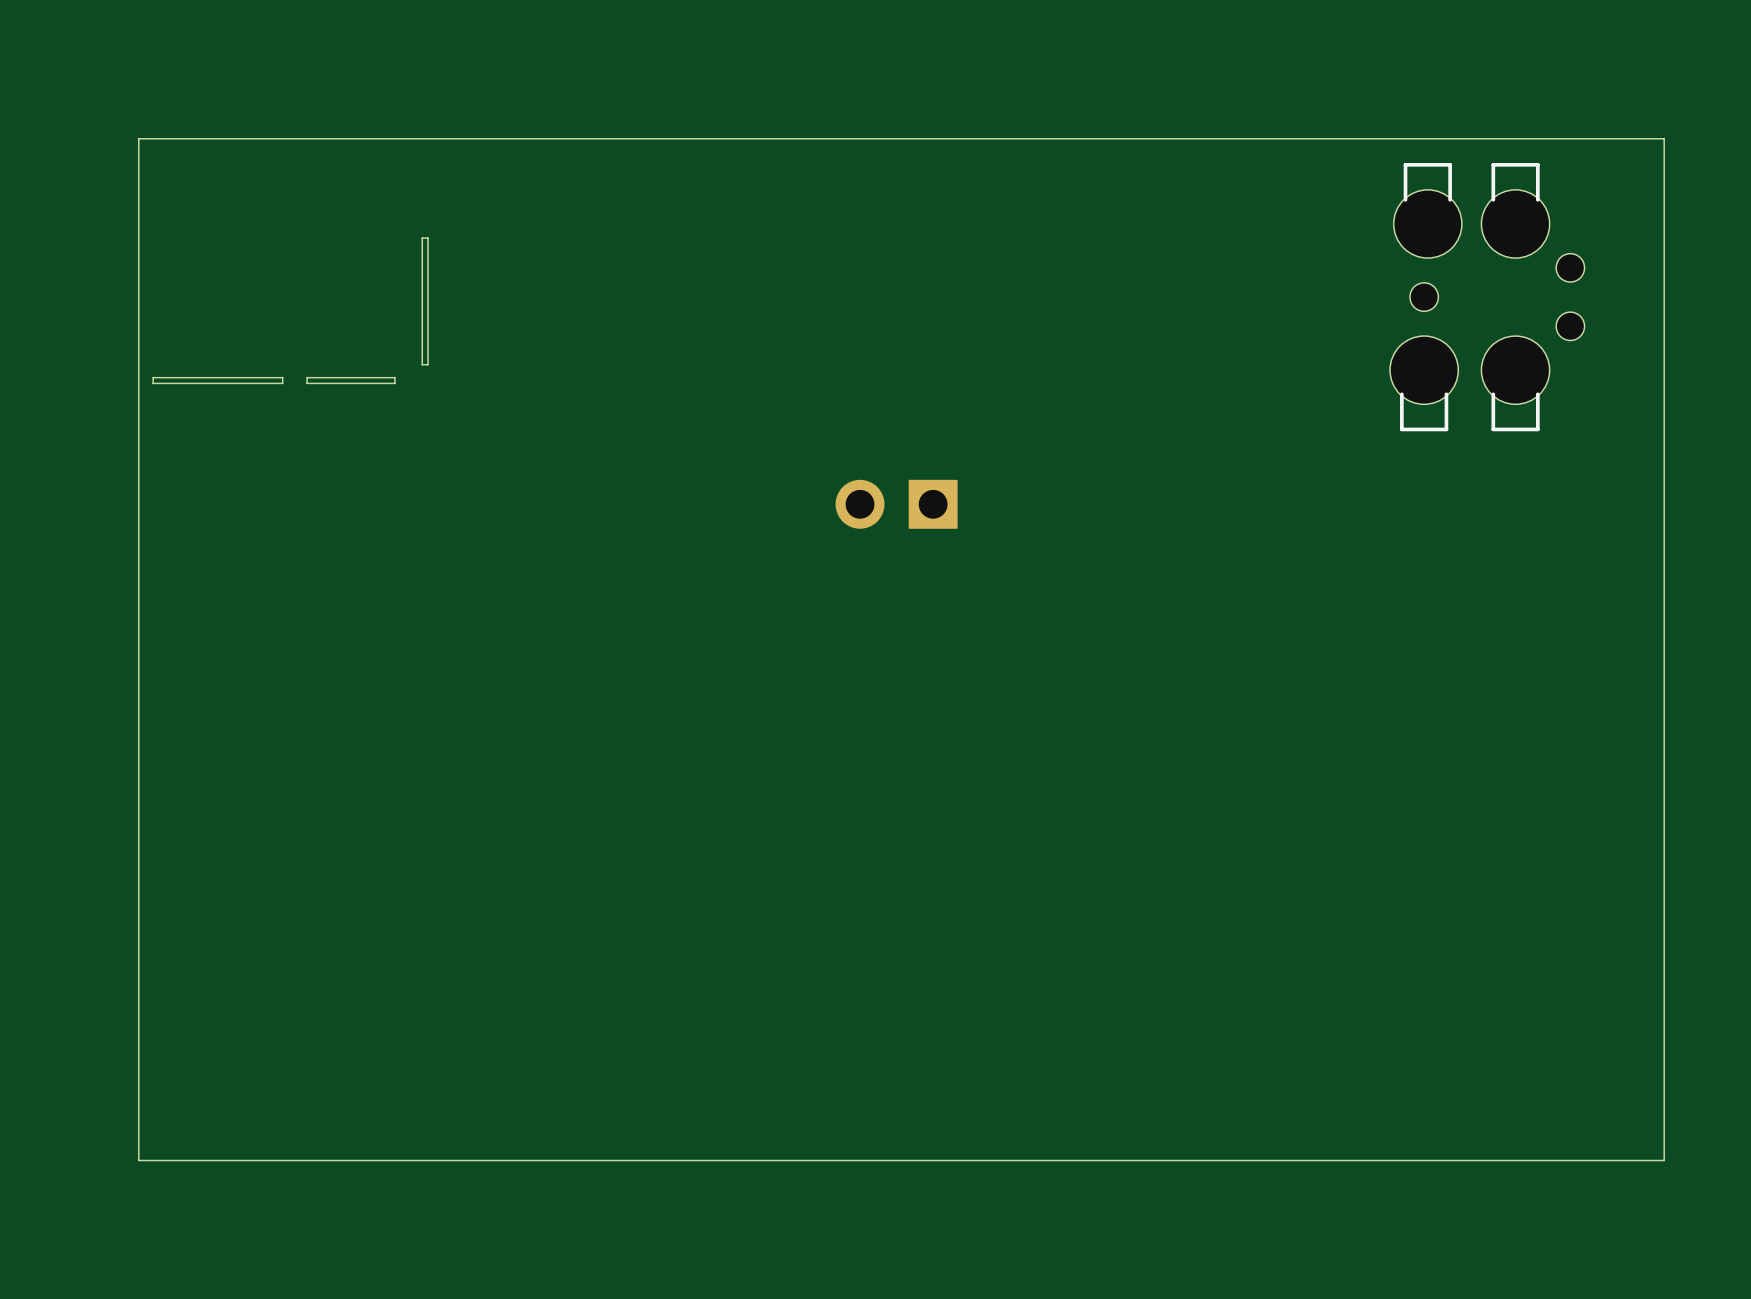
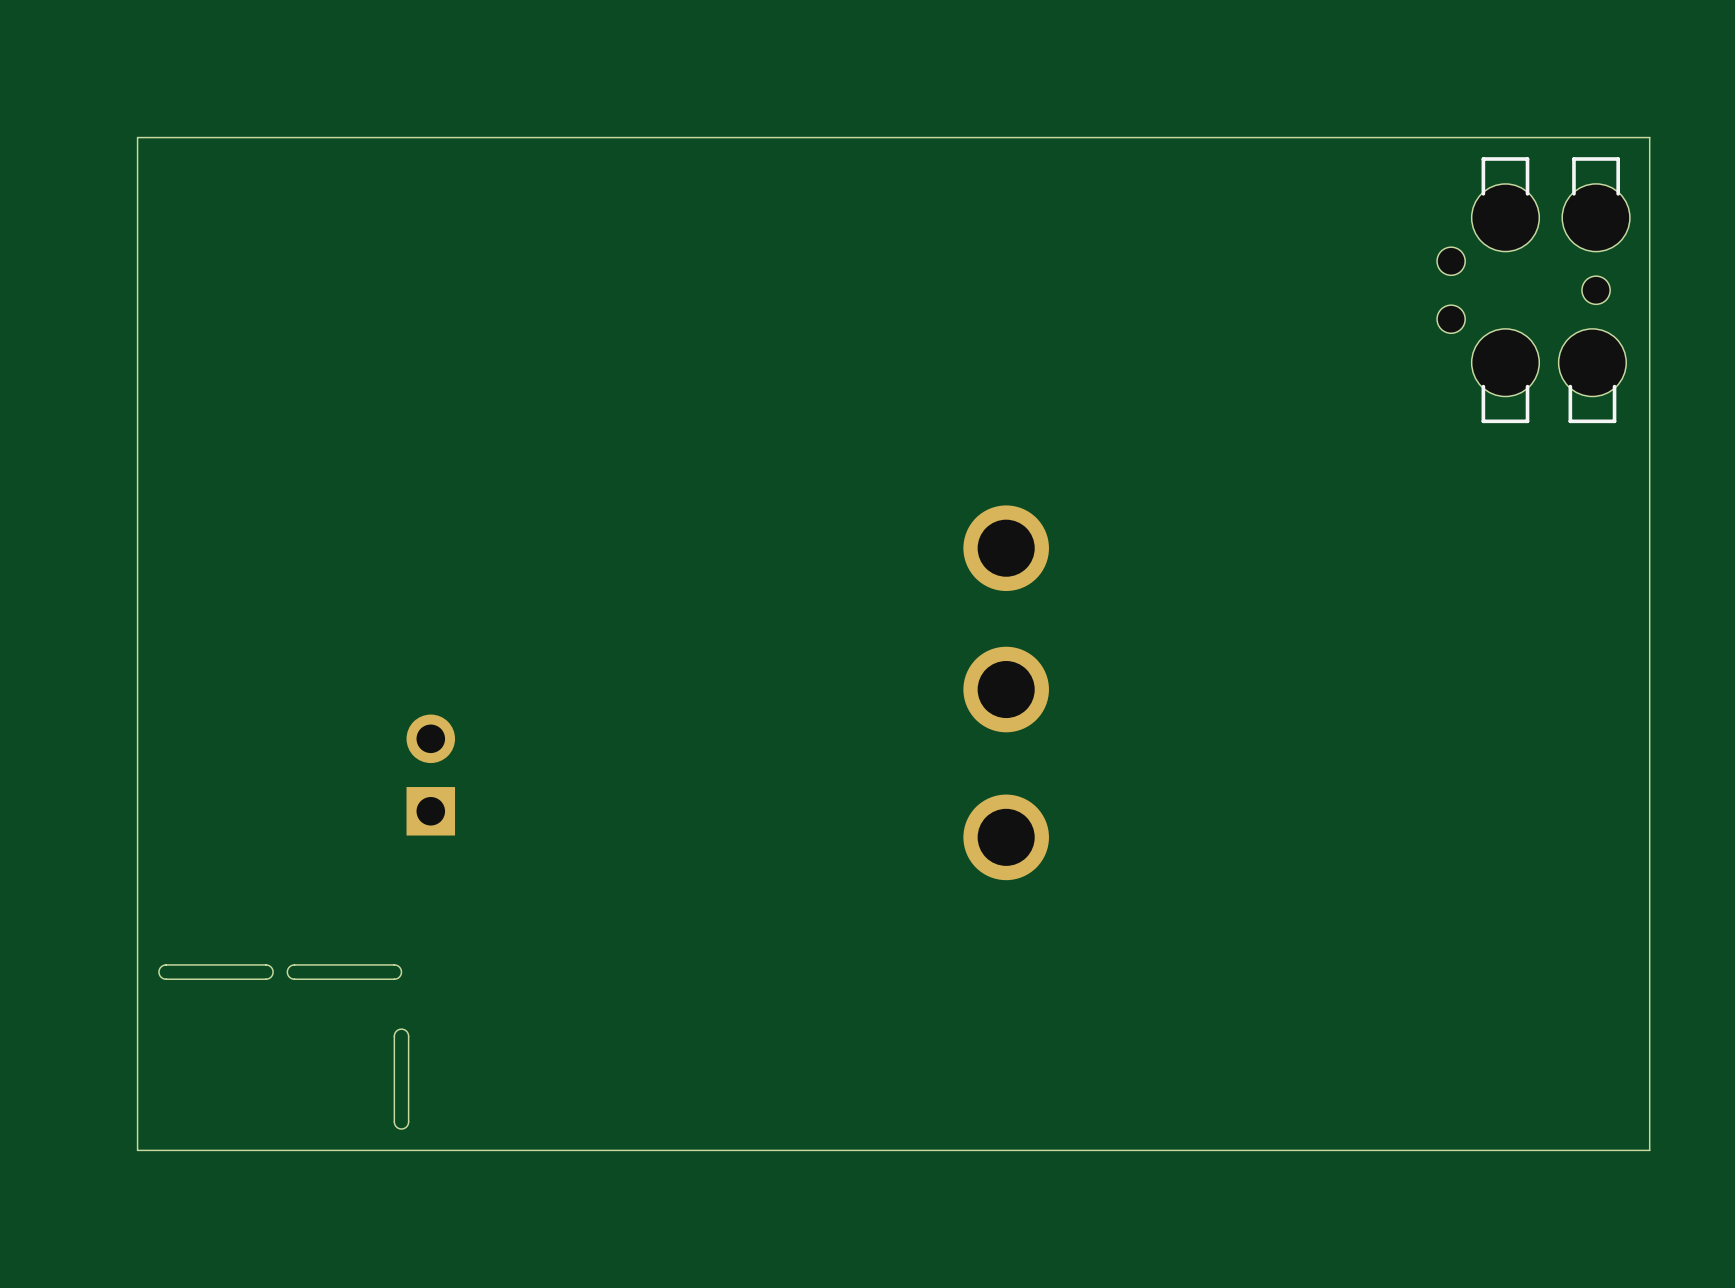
board edge: (428, 238) (422, 238) (422, 364) (428, 364) (428, 238) -> none
part rotation: 0° (1487, 297) -> 180° (1533, 290)
board edge: (282, 377) (153, 377) (153, 383) (282, 383) (282, 377) -> none
board edge: (394, 377) (307, 377) (307, 383) (394, 383) (394, 377) -> none
part rotation: 0° (896, 504) -> 90° clockwise (430, 775)
part position: (896, 504) -> (430, 775)
part: none -> (1006, 548)
part: none -> (1006, 689)
part: none -> (1006, 837)
board edge: none -> (265, 964) (165, 965) (160, 967) (159, 973) (161, 977) (166, 979) (266, 979) (271, 976) (273, 971) (270, 966) (265, 964)
board edge: none -> (394, 964) (293, 965) (288, 967) (287, 973) (290, 977) (294, 979) (395, 979) (400, 976) (401, 971) (398, 966) (394, 964)
board edge: none -> (408, 1036) (408, 1122) (405, 1127) (400, 1128) (394, 1122) (394, 1035) (397, 1030) (402, 1029) (407, 1031) (408, 1036)

